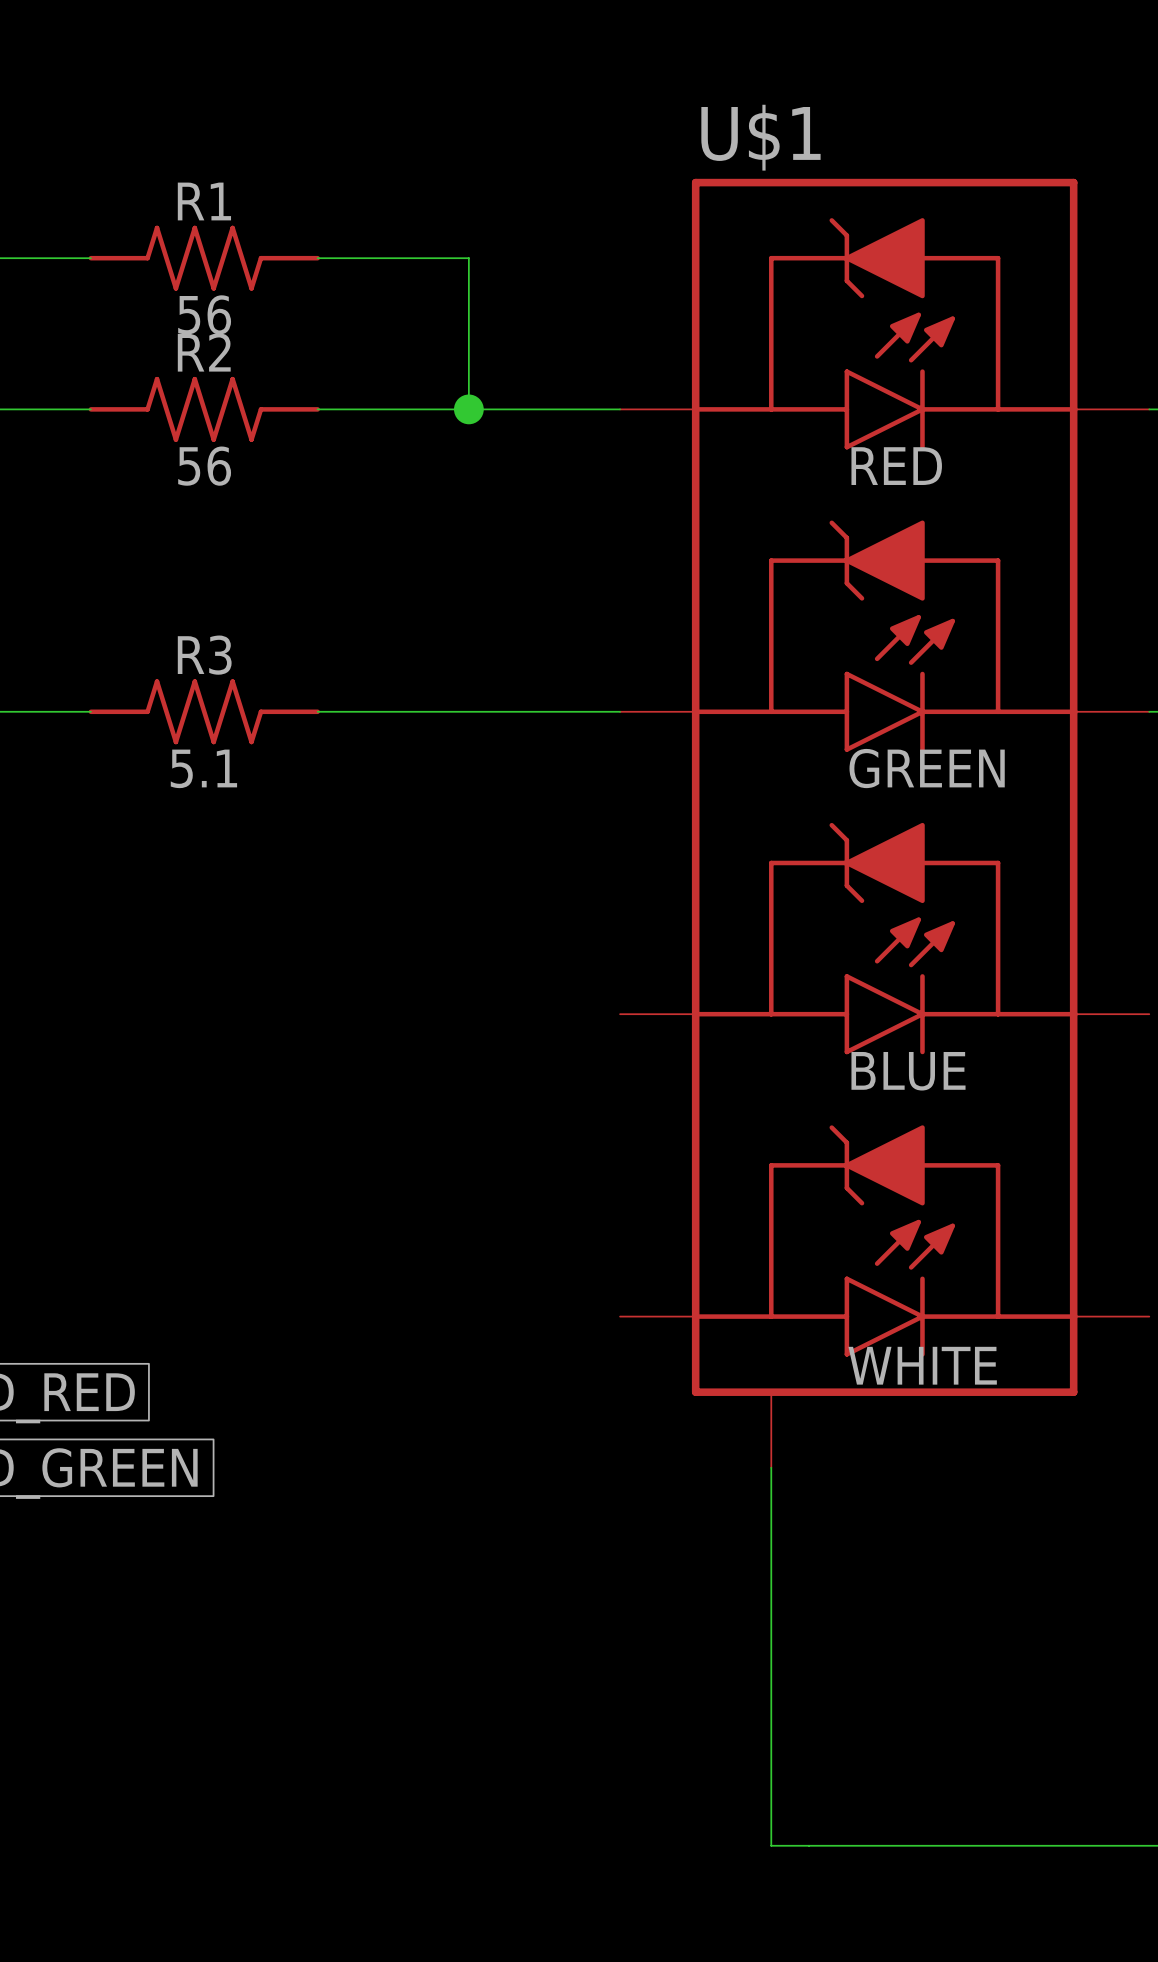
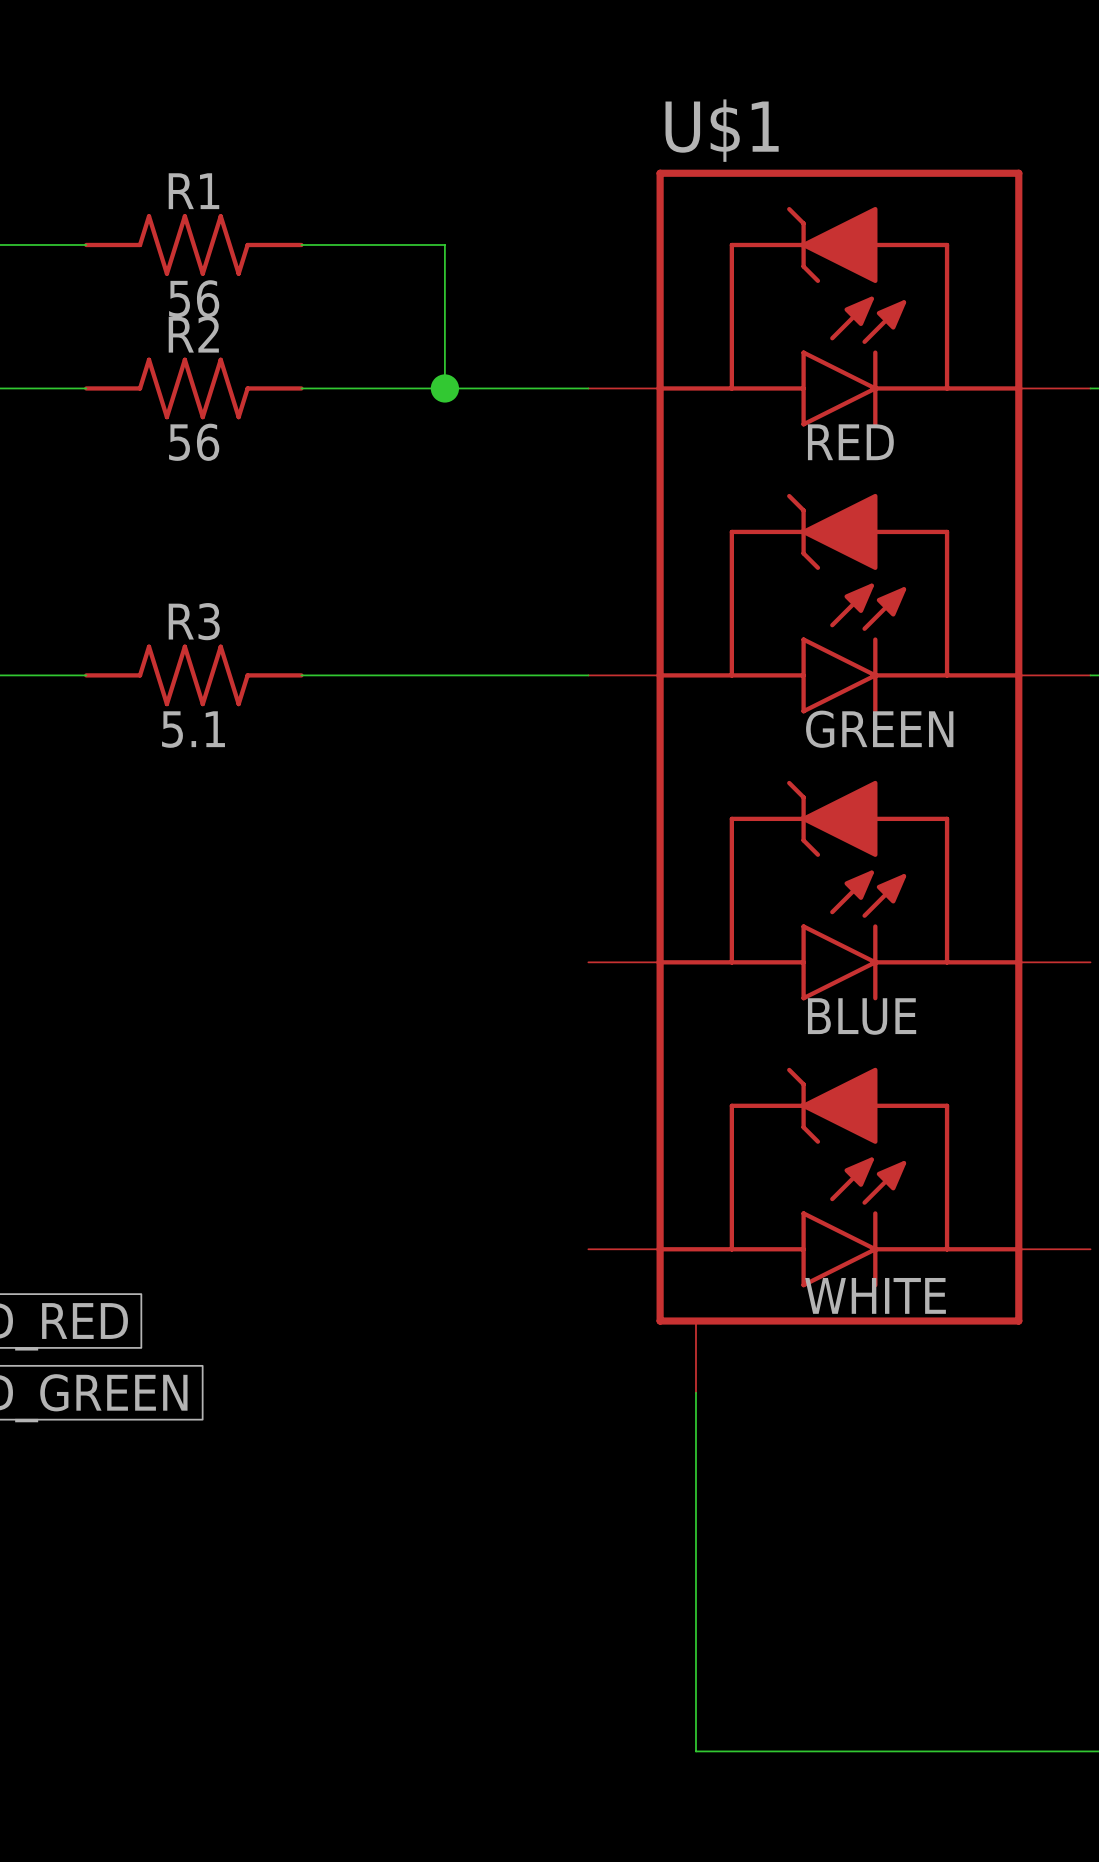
U$1 symbol: [620, 178, 1150, 1468] -> [588, 169, 1091, 1393]
wire: (771, 1467) (771, 1845) -> (695, 1392) (695, 1751) (731, 1751)

